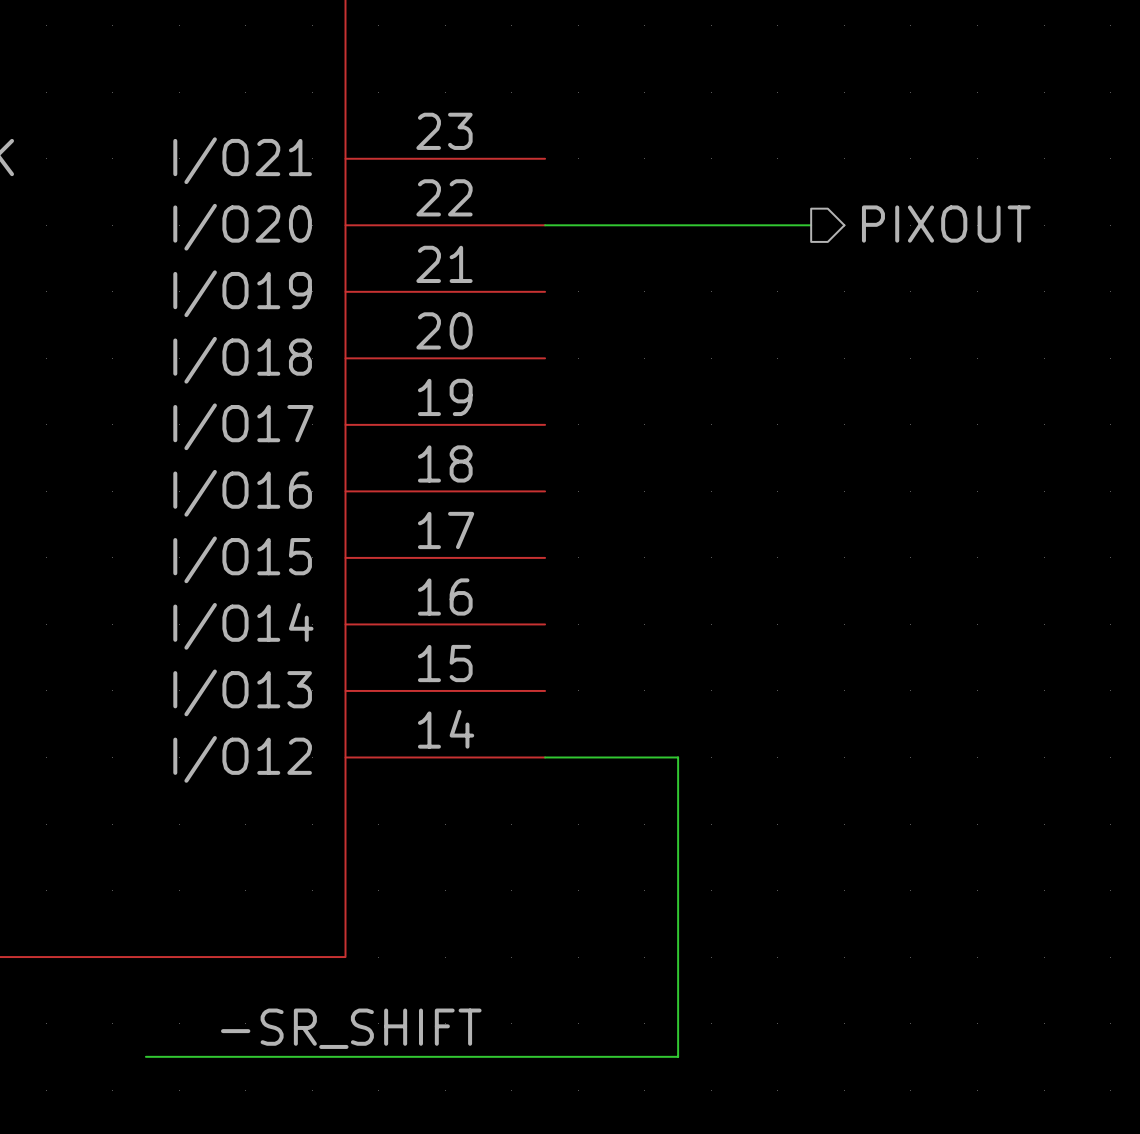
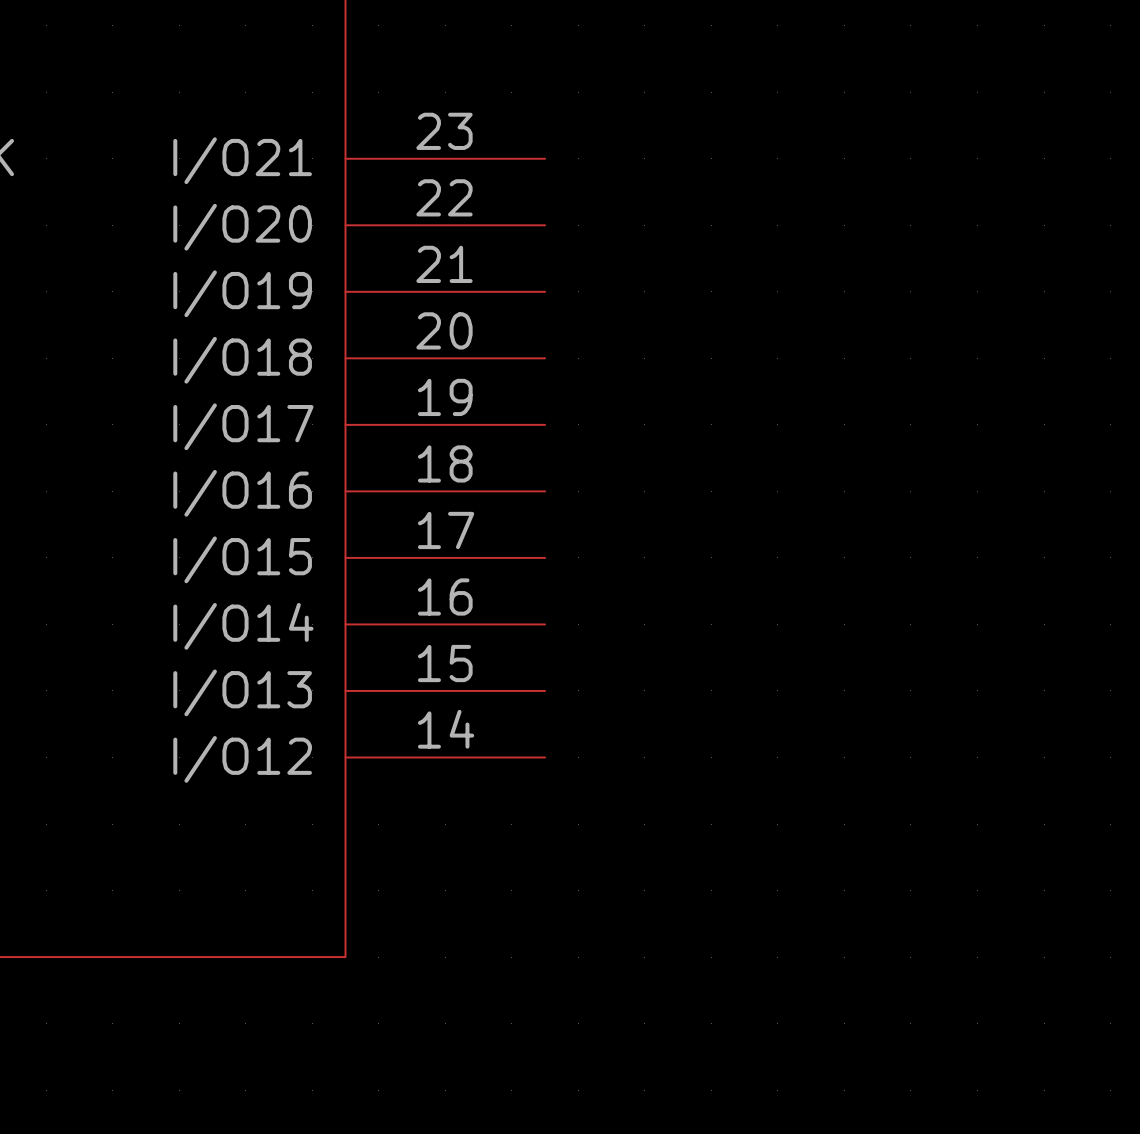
hierarchical label: PIXOUT (946, 224) -> none
wire: (545, 225) (811, 225) -> none
wire: (545, 757) (678, 757) (678, 1056) (145, 1056) -> none
label: -SR_SHIFT (351, 1028) -> none

